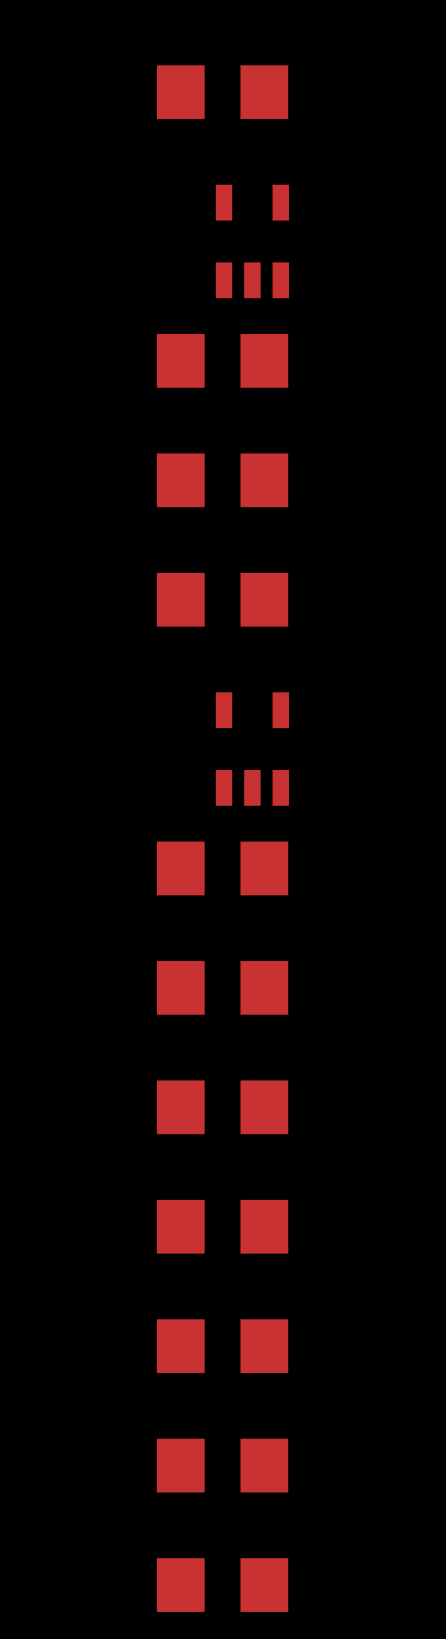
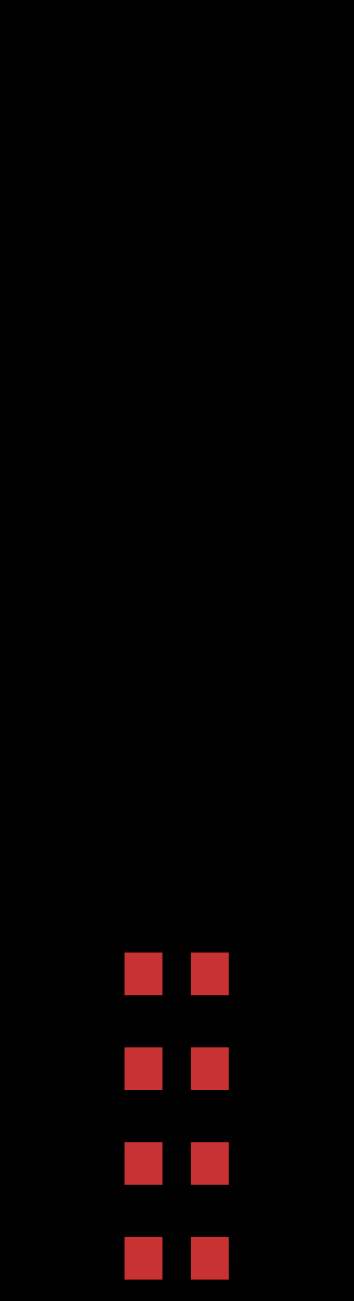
part: (222, 92) -> none
part: (252, 241) -> none
part: (222, 360) -> none
part: (222, 480) -> none
part: (222, 599) -> none
part: (252, 749) -> none
part: (222, 868) -> none
part: (222, 987) -> none
part: (222, 1107) -> none

